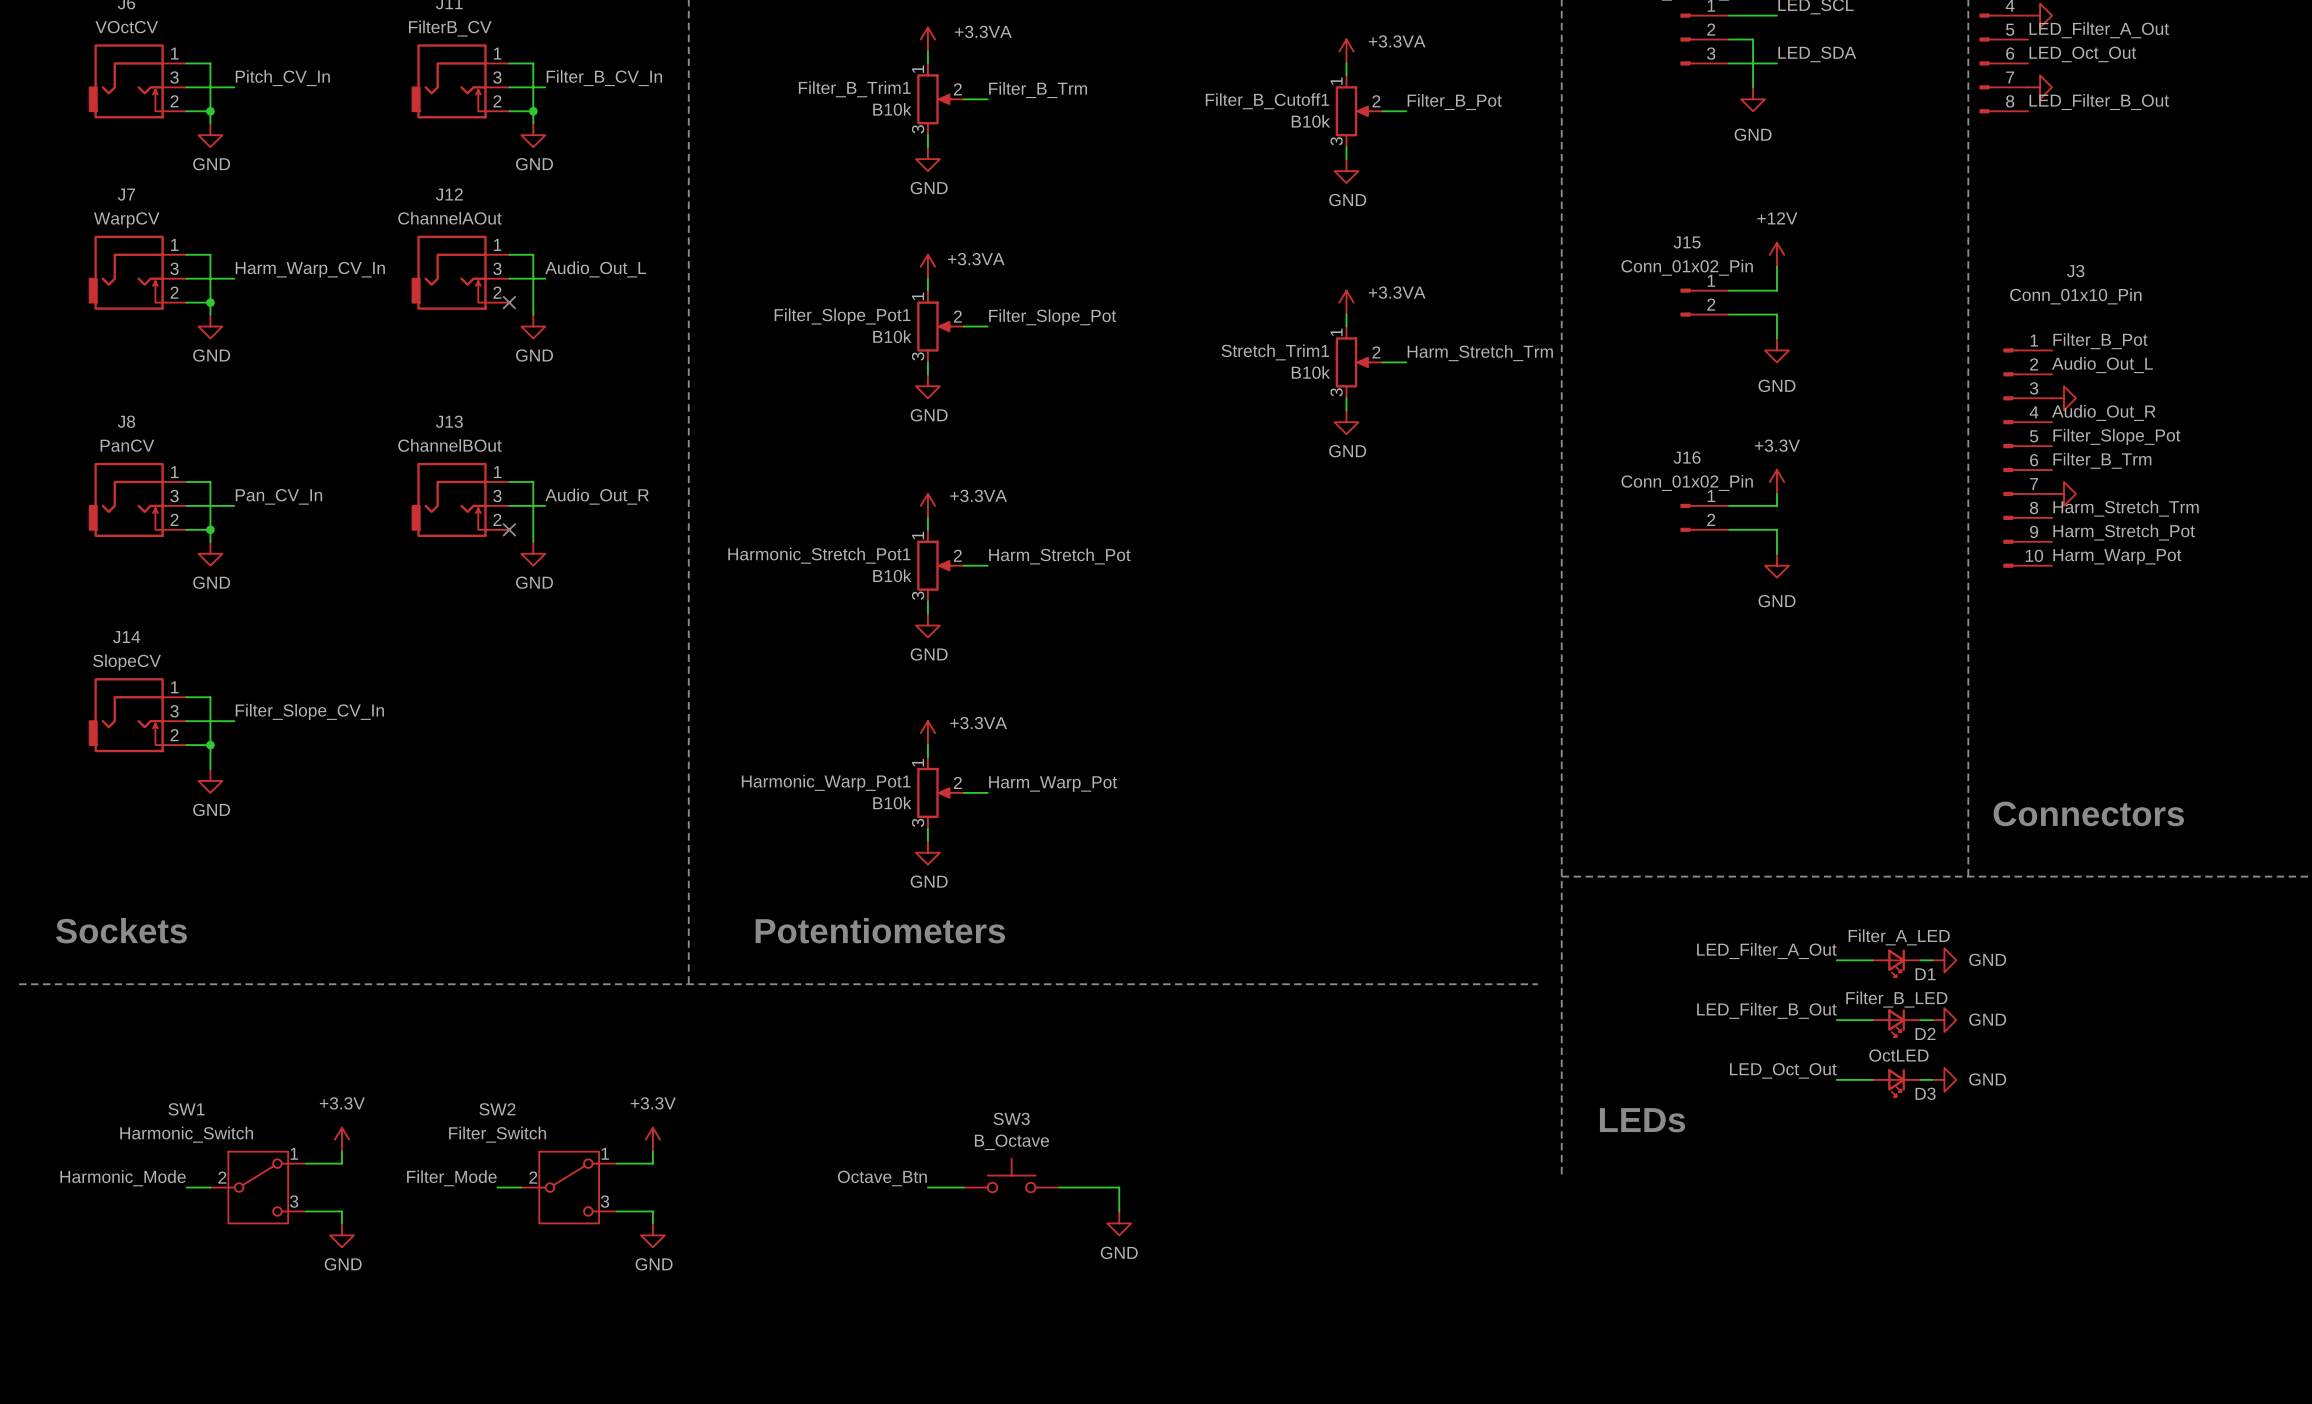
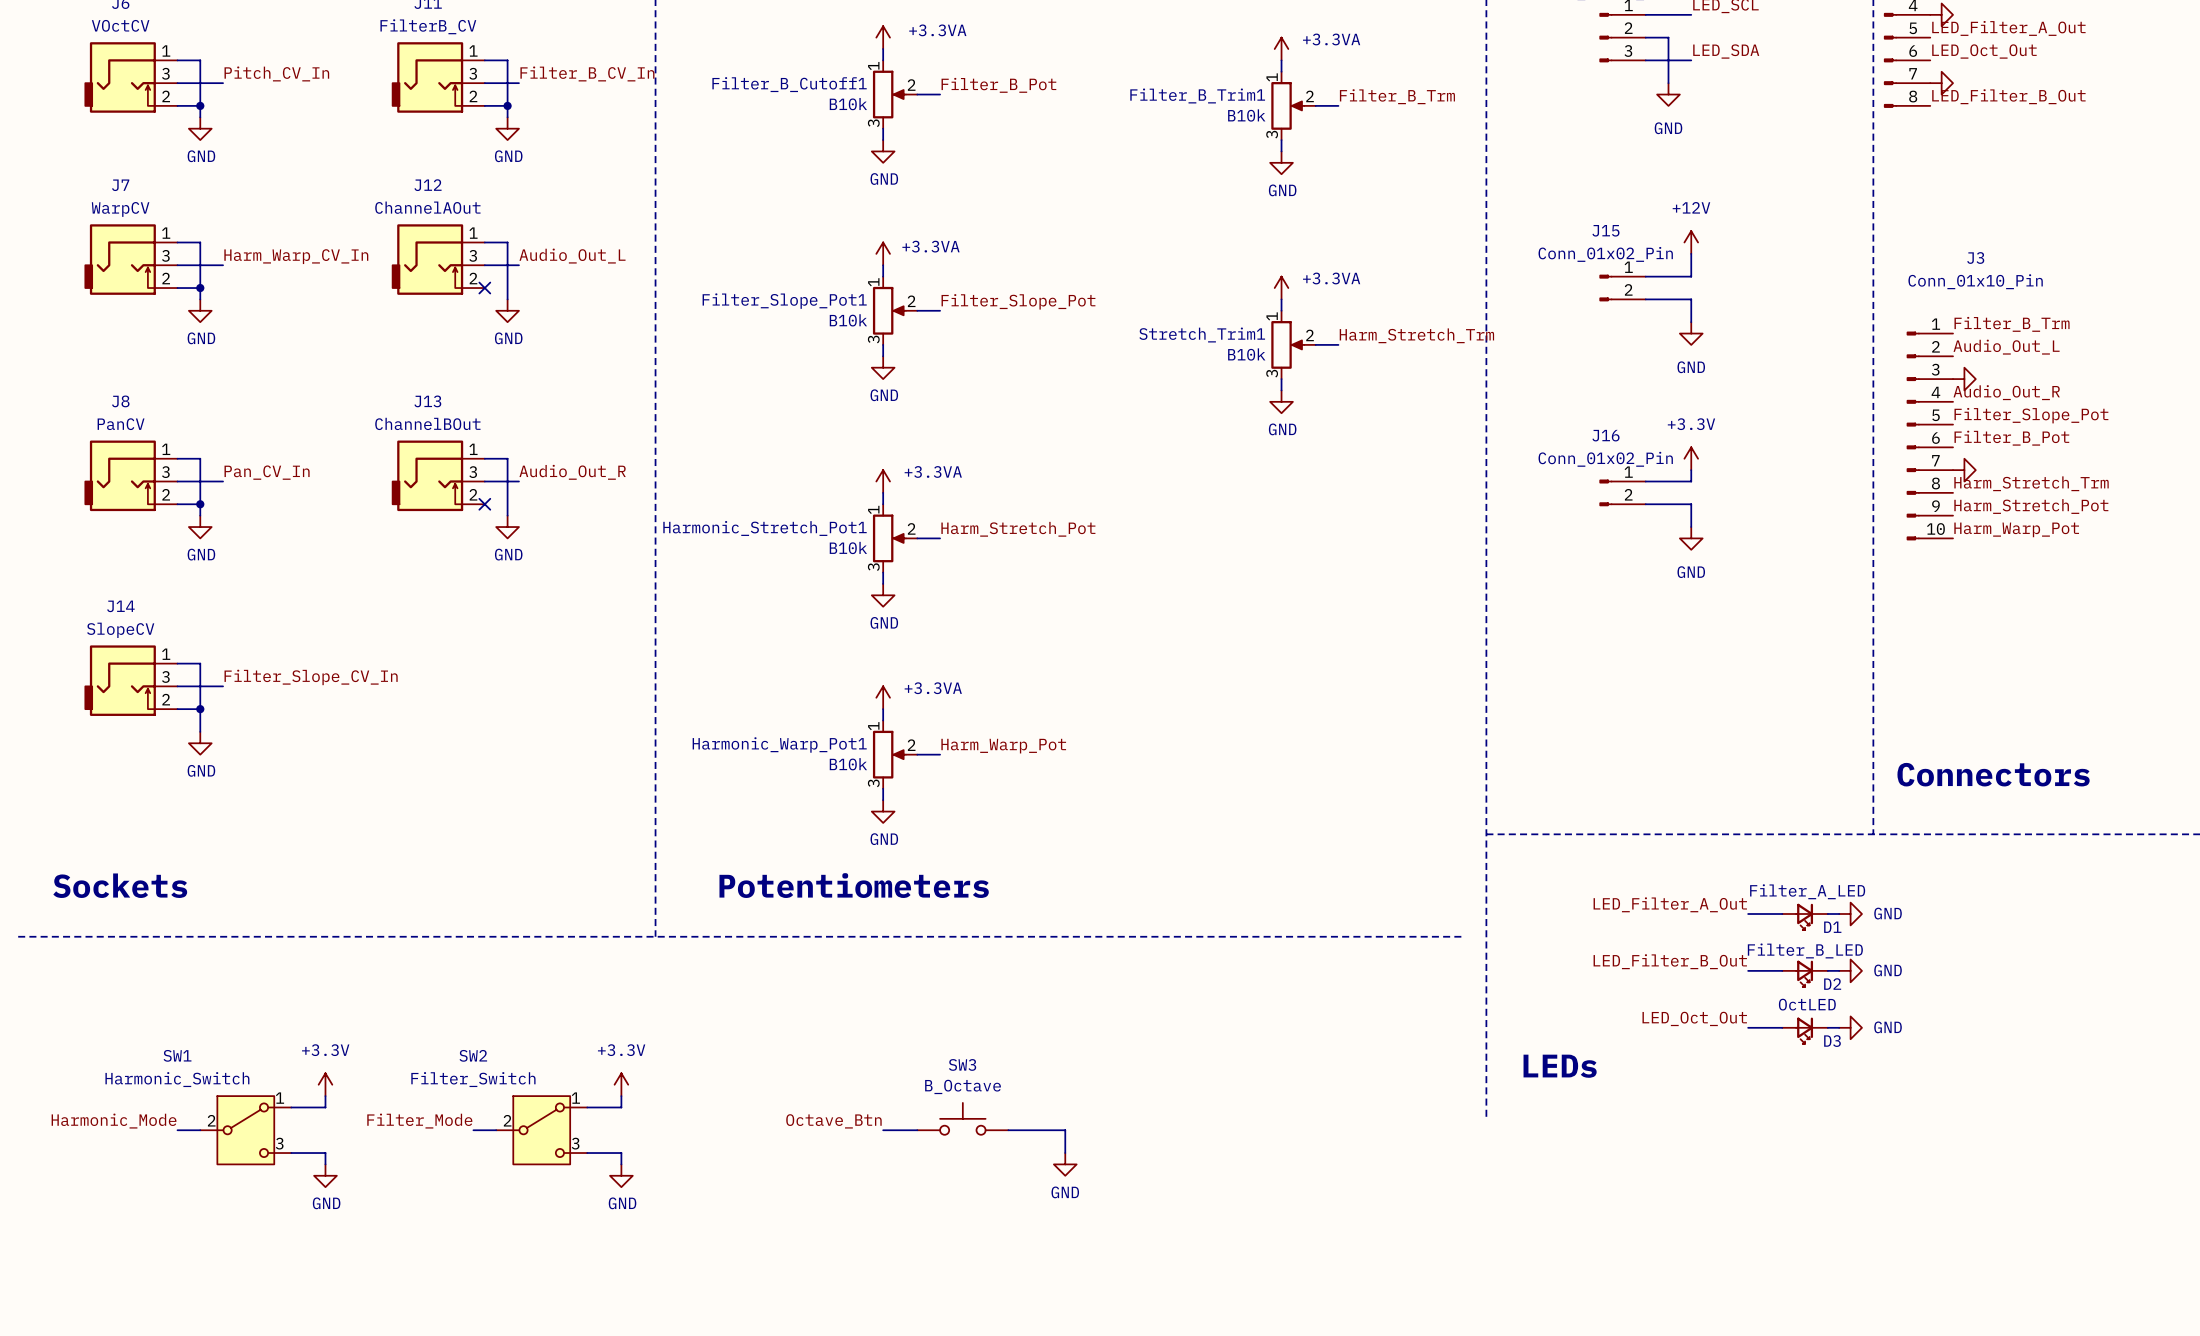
Filter_B_Trim1 name: Filter_B_Trim1 (854, 89) -> Filter_B_Cutoff1 (789, 84)
label: Filter_B_Trm (1038, 90) -> Filter_B_Pot (998, 85)
Filter_B_Cutoff1 name: Filter_B_Cutoff1 (1267, 101) -> Filter_B_Trim1 (1197, 95)
label: Filter_B_Pot (1454, 102) -> Filter_B_Trm (1397, 96)
label: Filter_B_Pot (2100, 341) -> Filter_B_Trm (2012, 324)
label: Filter_B_Trm (2102, 460) -> Filter_B_Pot (2011, 438)

